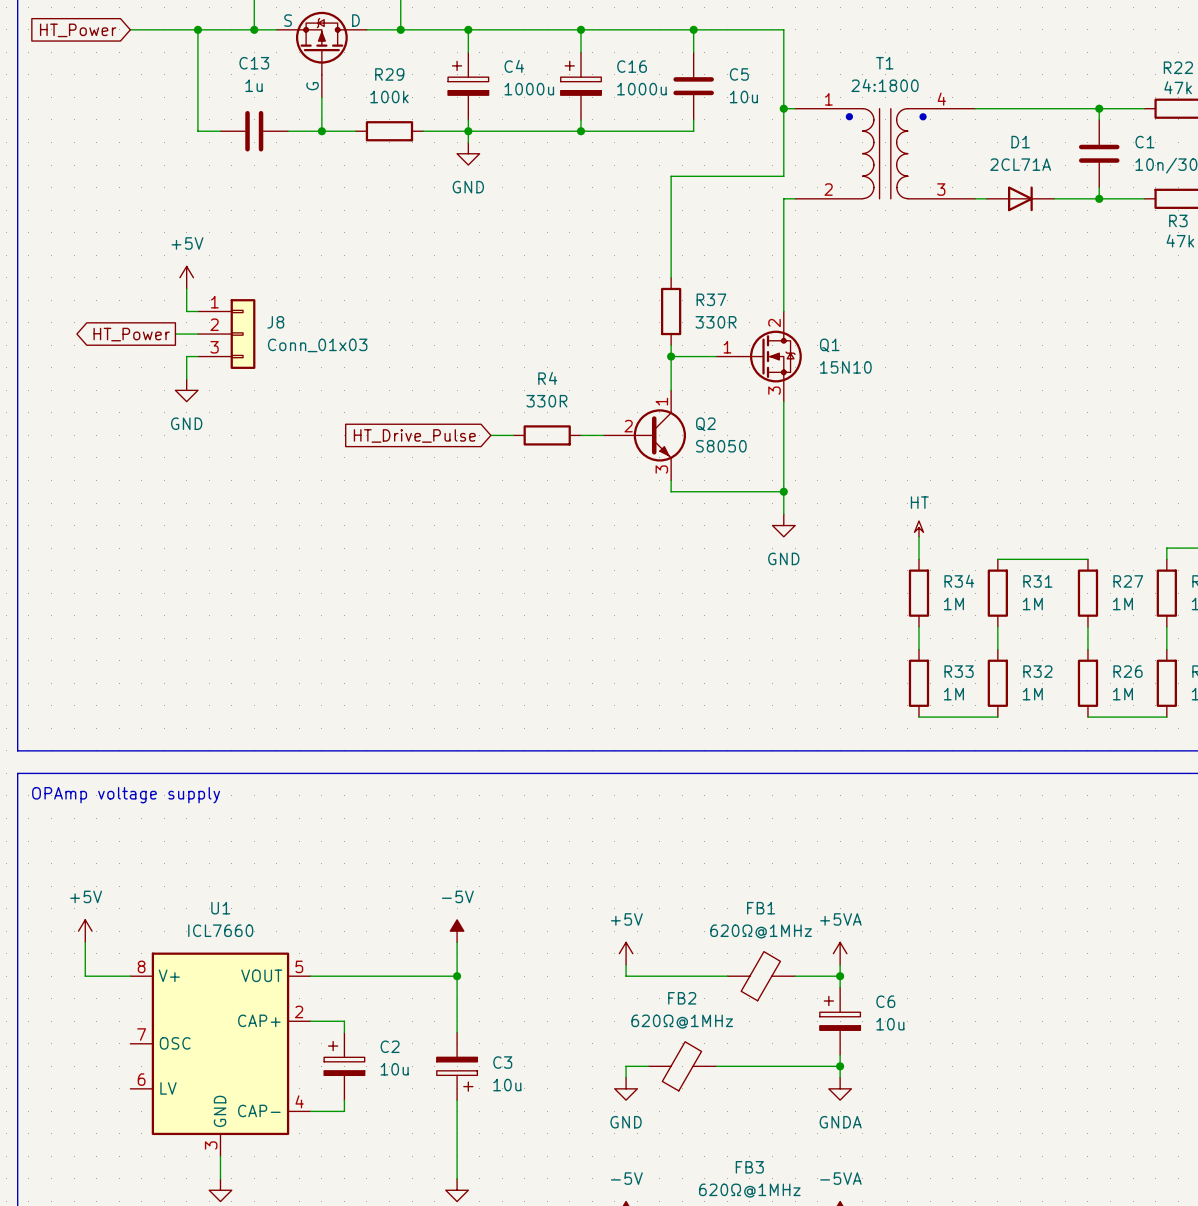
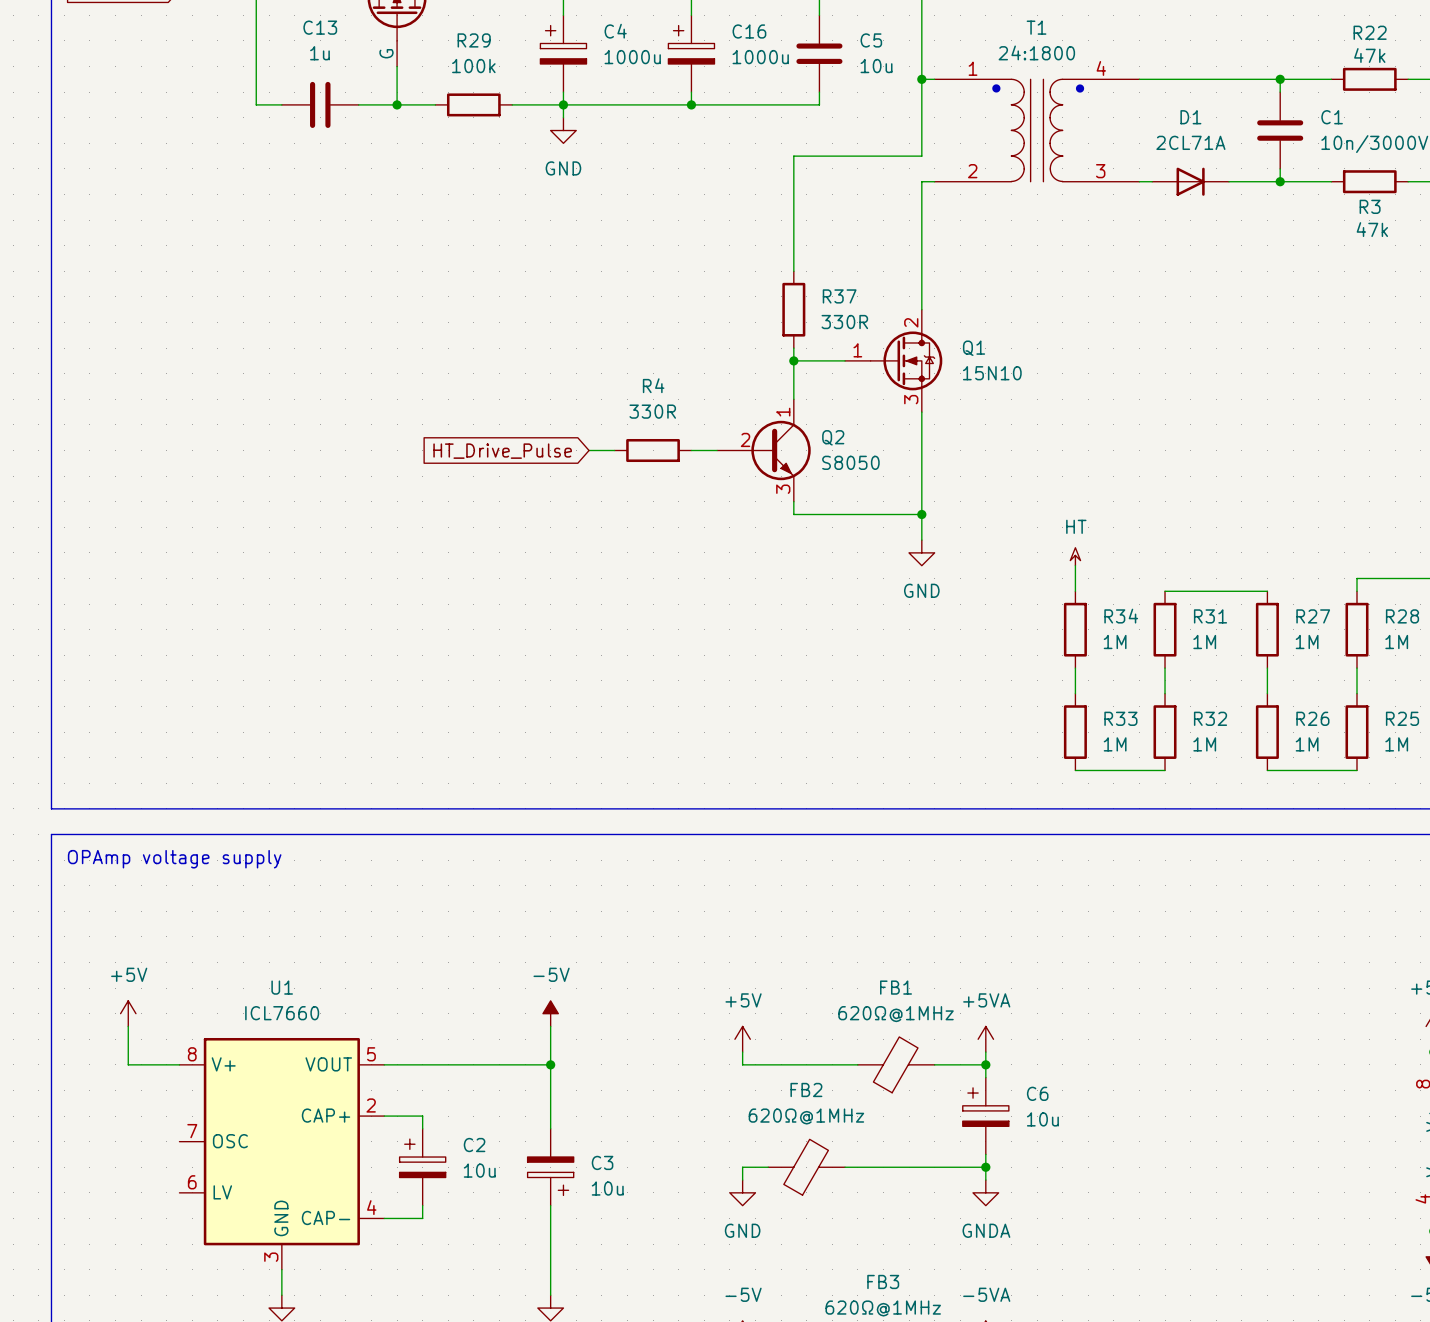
power symbol: +5V (186, 277) -> none
wire: (186, 288) (186, 311) (197, 311) -> none
global label: HT_Power (131, 334) -> none
wire: (175, 334) (197, 334) -> none
J8: Conn_01x03 (226, 334) -> none
wire: (197, 356) (186, 356) (186, 379) -> none
power symbol: GND (186, 390) -> none

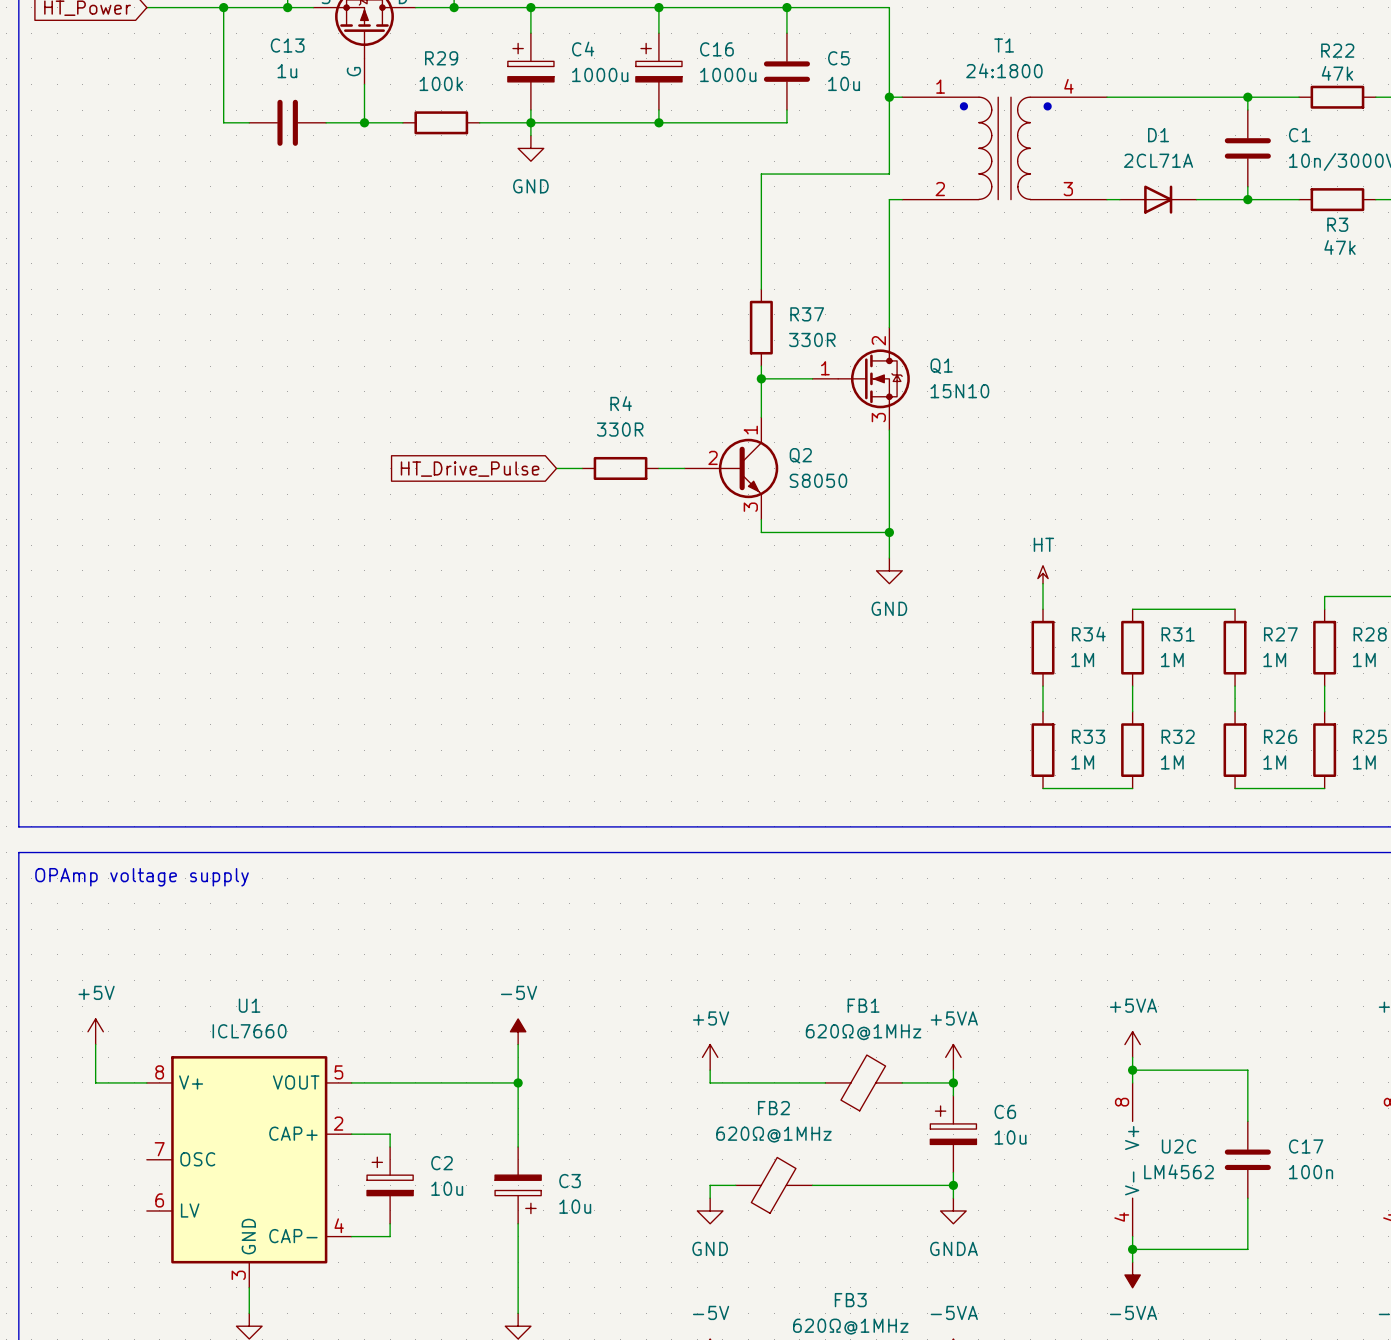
power symbol: none -> +5VA (1132, 1044)
wire: none -> (1132, 1057) (1132, 1082)
wire: none -> (1132, 1070) (1247, 1070) (1247, 1121)
junction: none -> (1132, 1070)
U2C: none -> LM4562 (1132, 1159)
C17: none -> 100n (1247, 1159)
wire: none -> (1247, 1198) (1247, 1249) (1132, 1249)
wire: none -> (1132, 1236) (1132, 1262)
junction: none -> (1132, 1249)
power symbol: none -> -5VA (1132, 1275)

